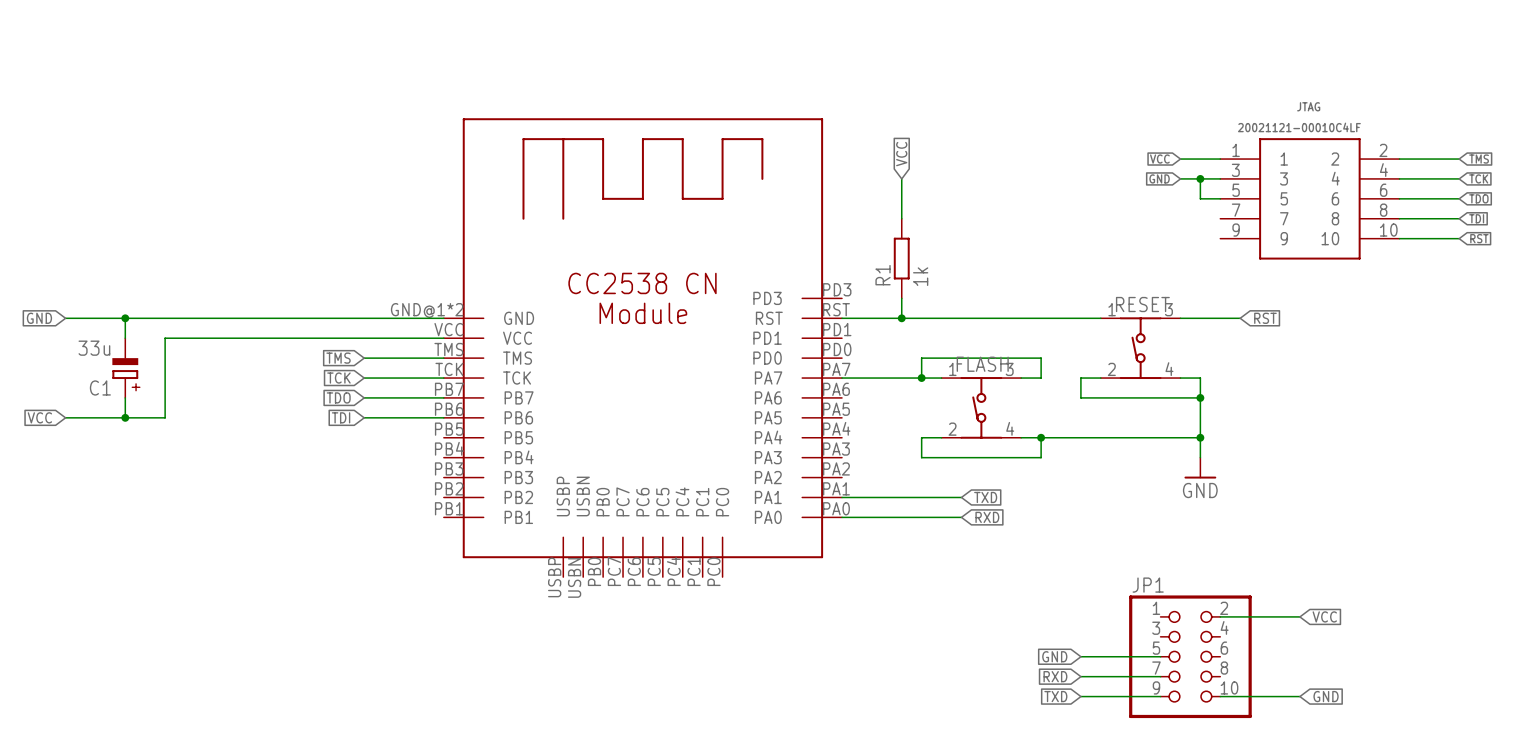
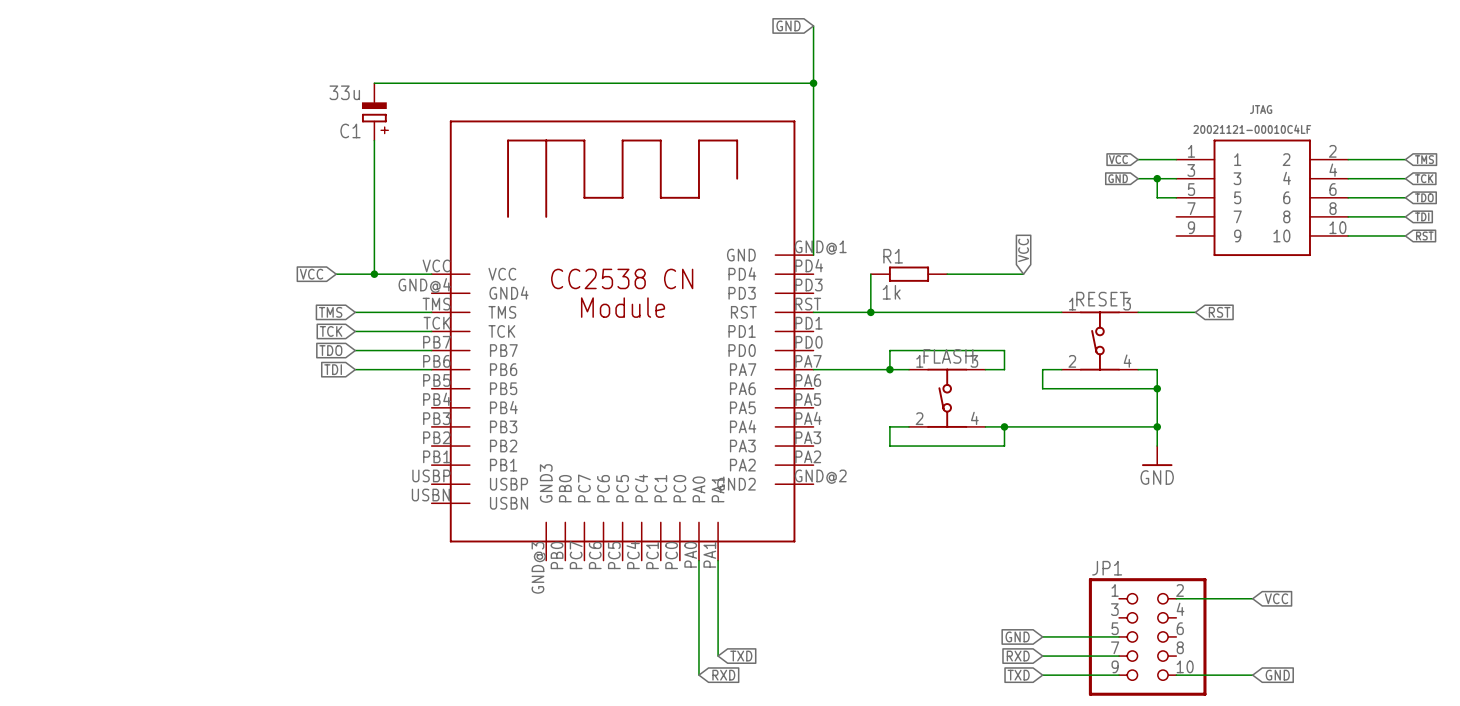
global label: none -> GND (788, 25)
wire: none -> (813, 25) (813, 255)
wire: none -> (374, 83) (813, 83)
junction: none -> (813, 83)
part symbol: [443, 118, 843, 578] -> [431, 120, 814, 561]
wire: none -> (374, 140) (374, 274)
global label position: VCC (901, 154) -> VCC (1023, 250)
wire: (901, 178) (901, 218) -> none
R1 rotation: 0° (901, 258) -> 90° clockwise (909, 274)
global label: none -> VCC (311, 274)
wire: none -> (336, 274) (431, 274)
junction: none -> (374, 274)
wire: none -> (947, 274) (1023, 274)
global label: GND (39, 318) -> none
wire: (65, 318) (364, 318) -> none
wire: (125, 318) (125, 338) -> none
junction: (125, 318) -> none
global label: none -> TMS (330, 312)
global label: none -> TCK (331, 331)
wire: (364, 338) (165, 338) (165, 417) (65, 417) -> none
global label: TMS (338, 358) -> TDO (330, 350)
C1 position: (125, 368) -> (374, 111)
global label: TCK (338, 378) -> TDI (333, 369)
wire: (125, 397) (125, 417) -> none
global label: TDO (338, 397) -> none
wire: (364, 397) (443, 397) -> none
global label: VCC (39, 417) -> none
junction: (125, 417) -> none
global label: TDI (341, 417) -> none
wire: (364, 417) (443, 417) -> none
wire: (842, 497) (961, 497) -> none
global label: TXD (985, 497) -> none
wire: (842, 517) (961, 517) -> none
global label: RXD (987, 517) -> none
wire: none -> (698, 560) (698, 675)
wire: none -> (718, 560) (718, 656)
global label: none -> TXD (741, 656)
global label: none -> RXD (723, 675)

